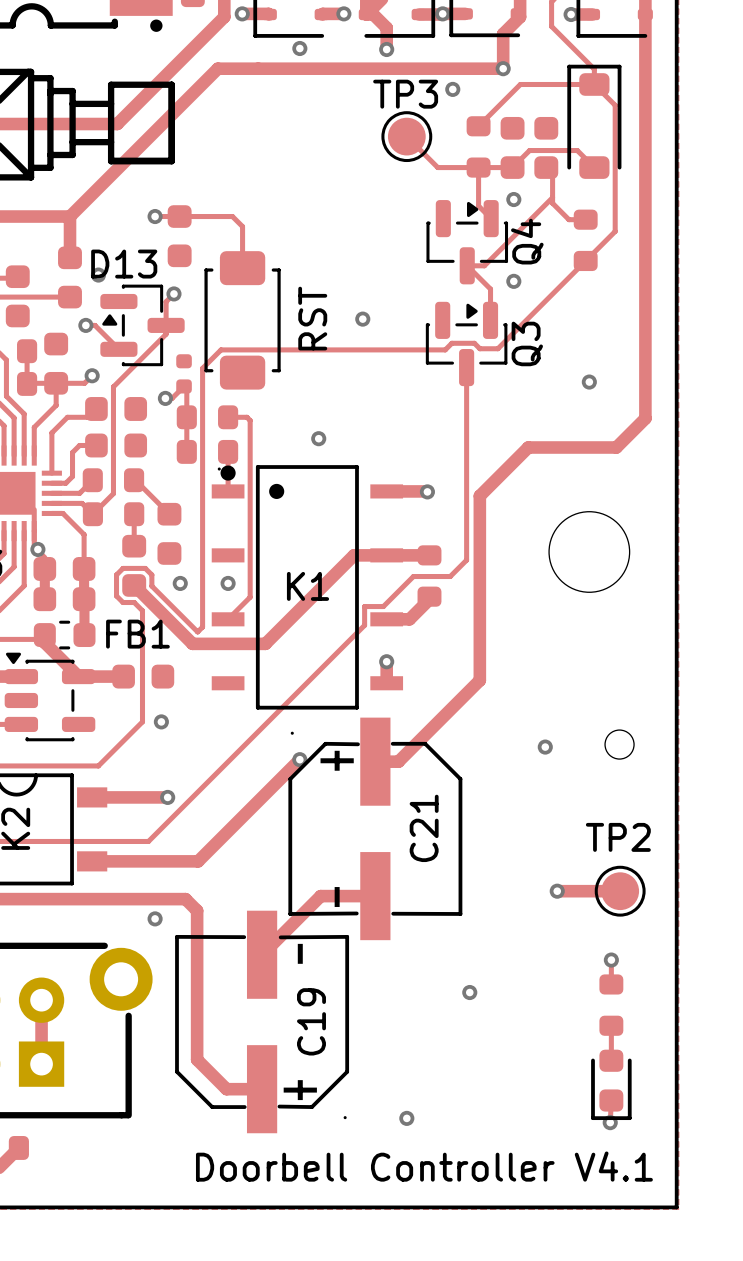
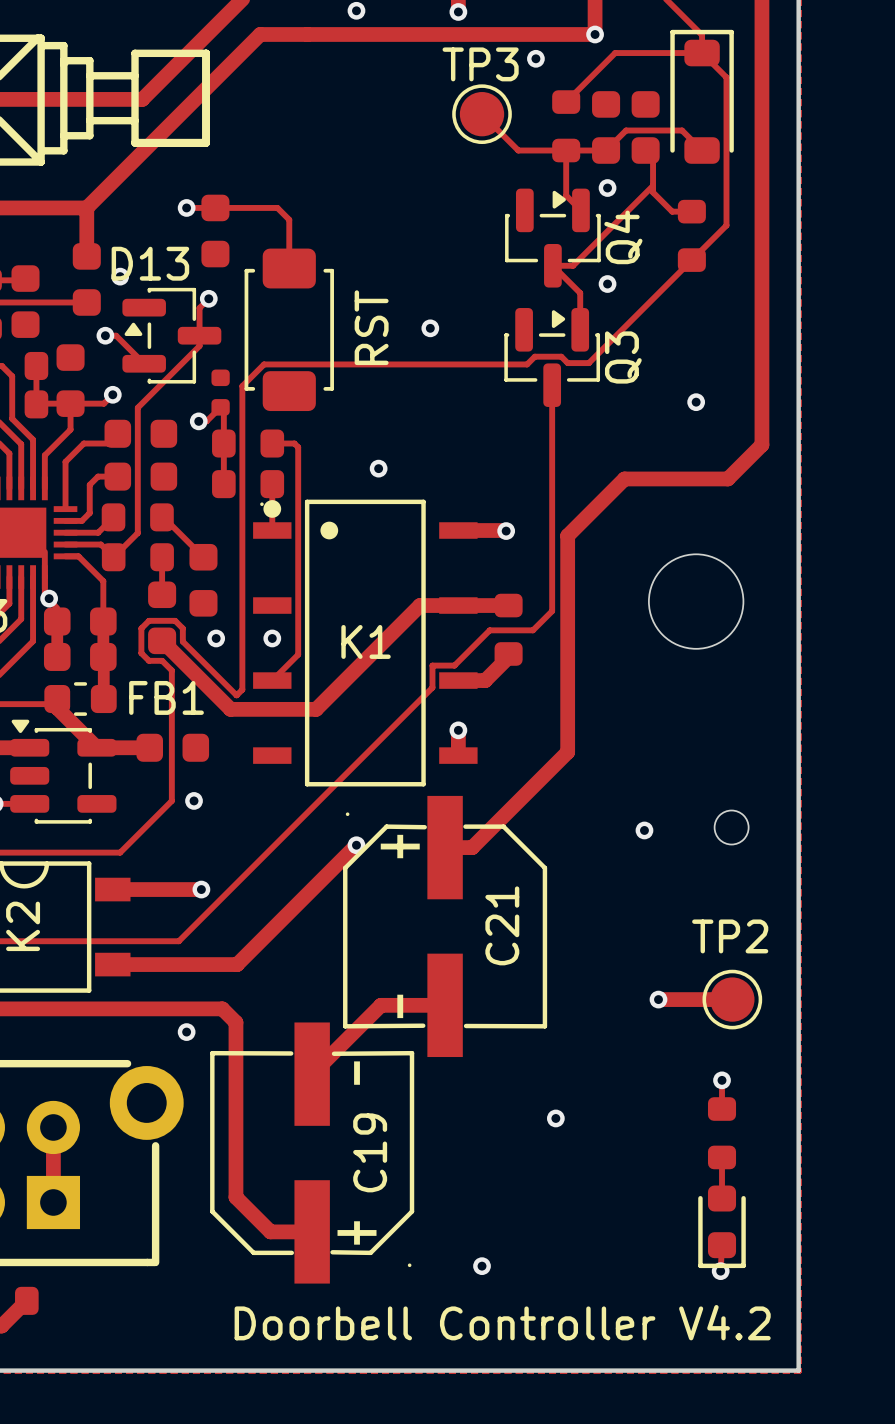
text: Doorbell Controller V4.1 (424, 1166) -> Doorbell Controller V4.2 (502, 1322)

